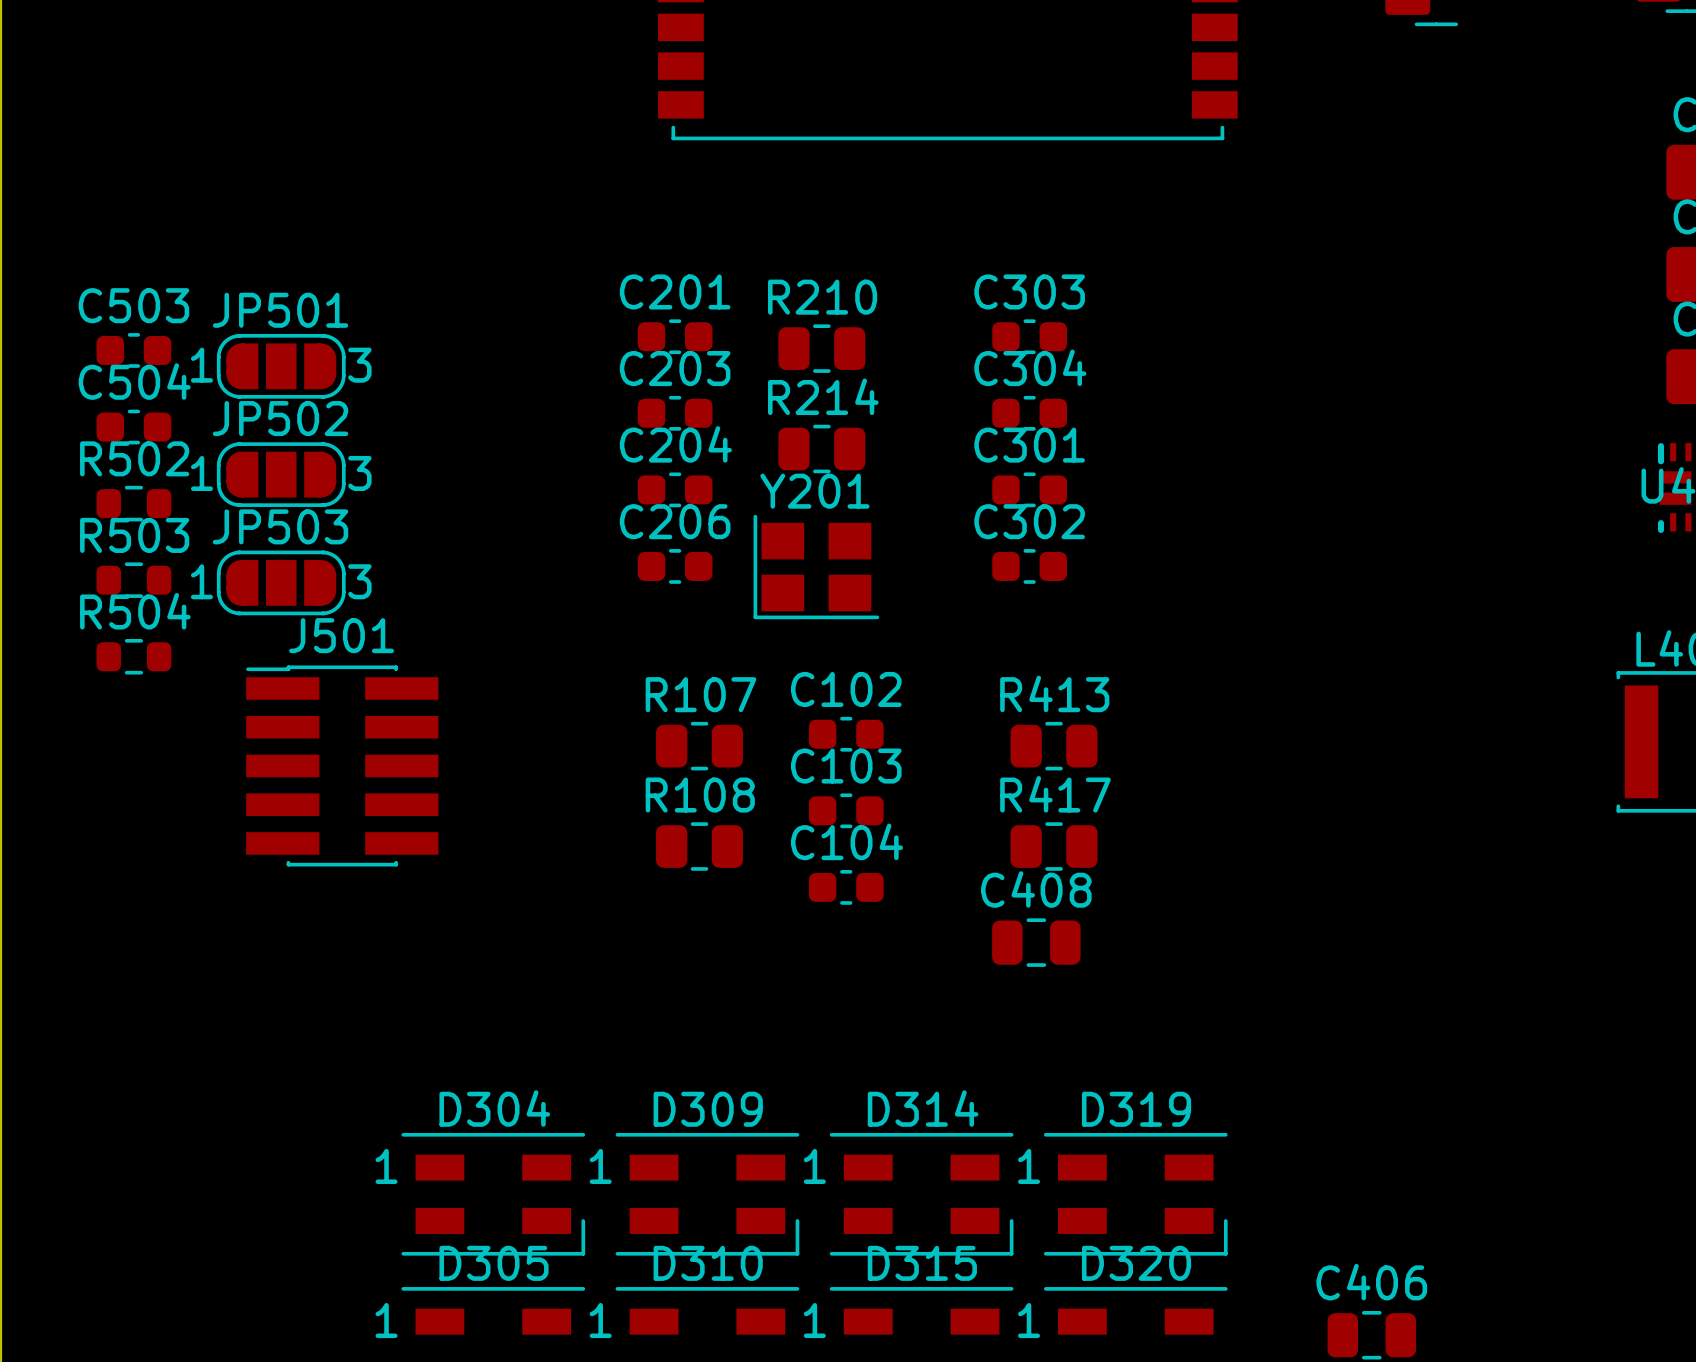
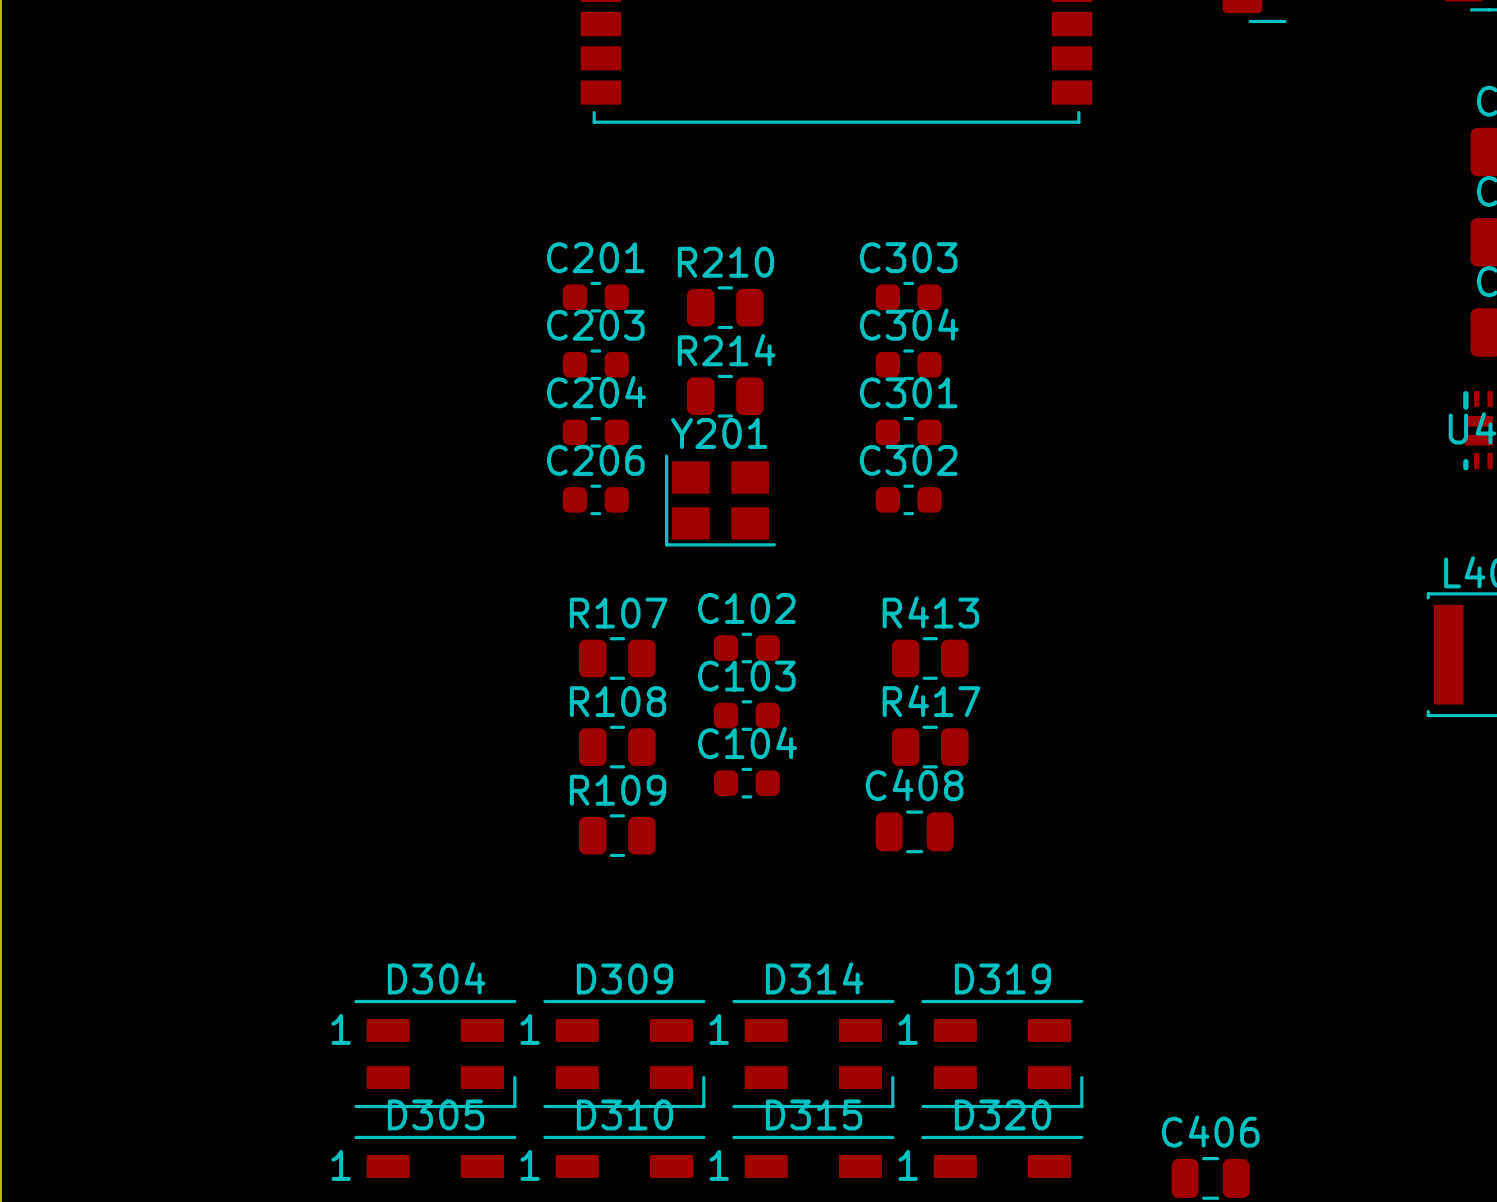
C503: (133, 350) -> none
JP501: (281, 366) -> none
C504: (133, 427) -> none
JP502: (281, 474) -> none
R502: (133, 503) -> none
R503: (133, 580) -> none
JP503: (281, 582) -> none
R504: (133, 656) -> none
J501: (342, 765) -> none
R109: none -> (617, 835)

